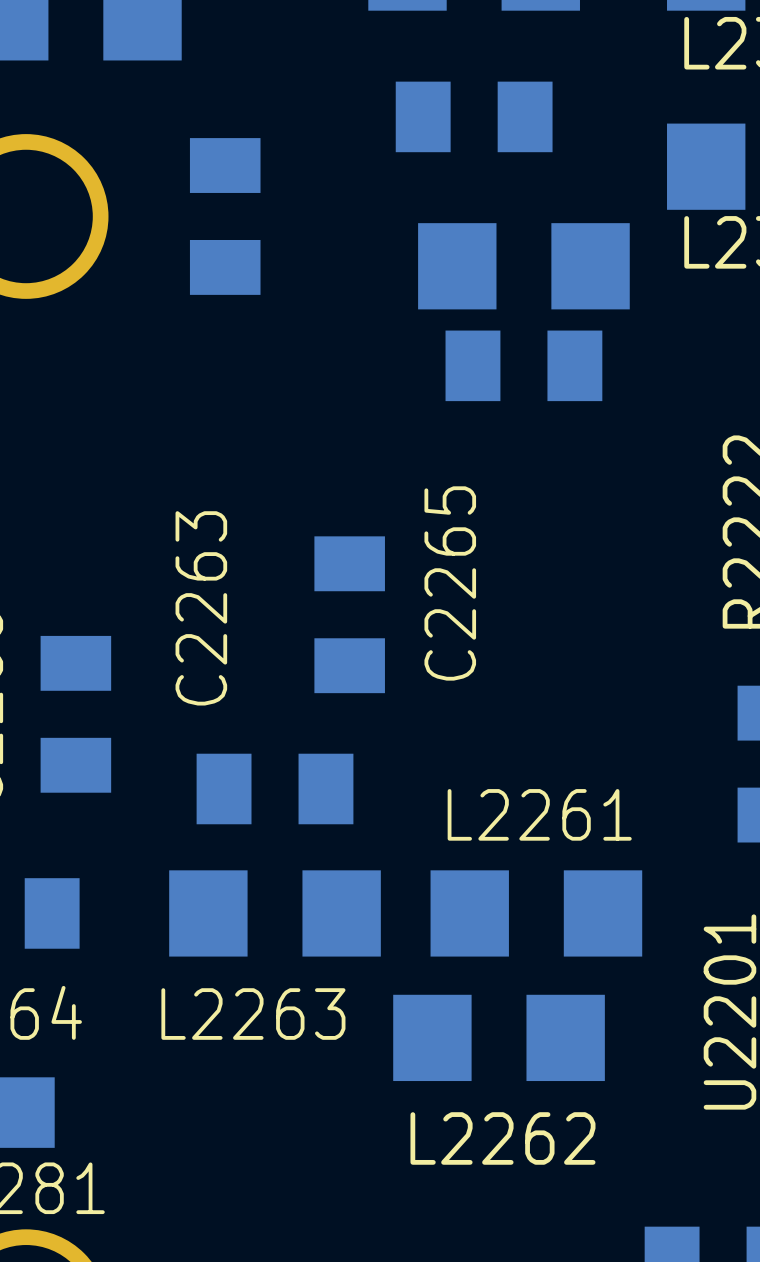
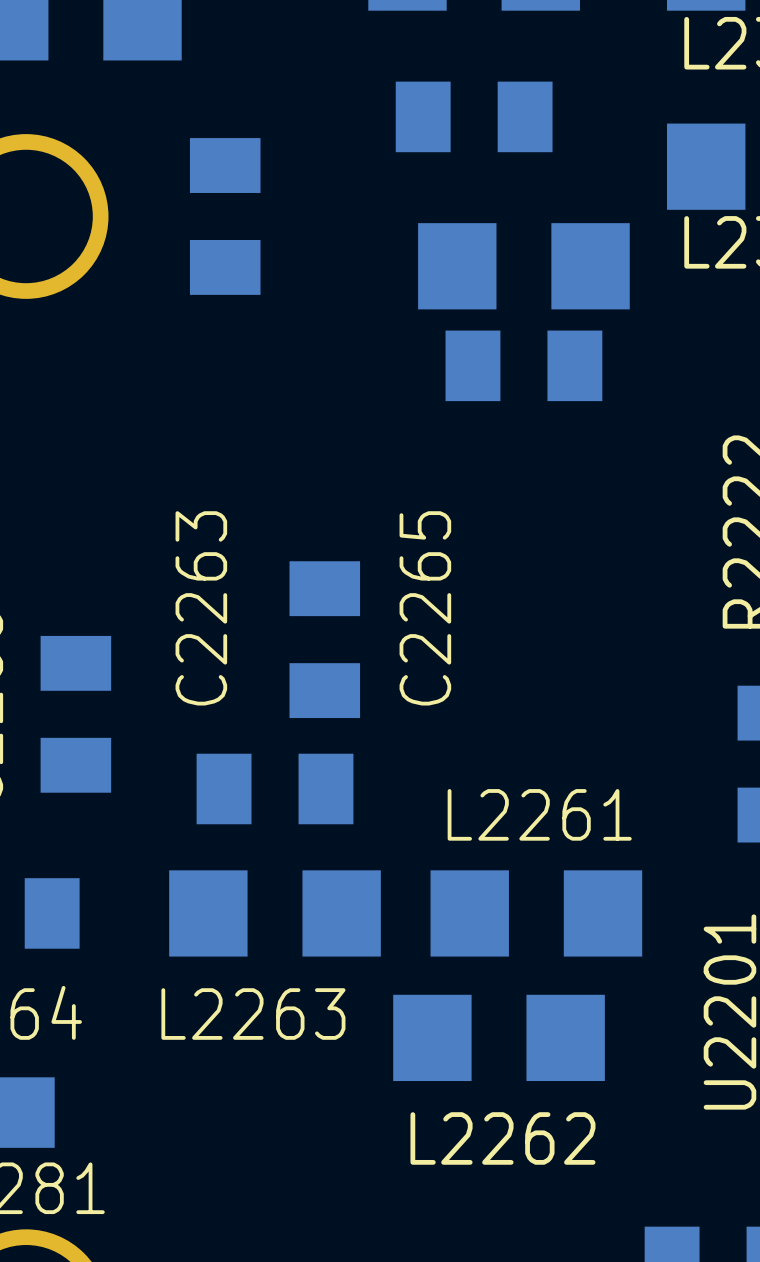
C2265 position: (349, 614) -> (324, 639)

